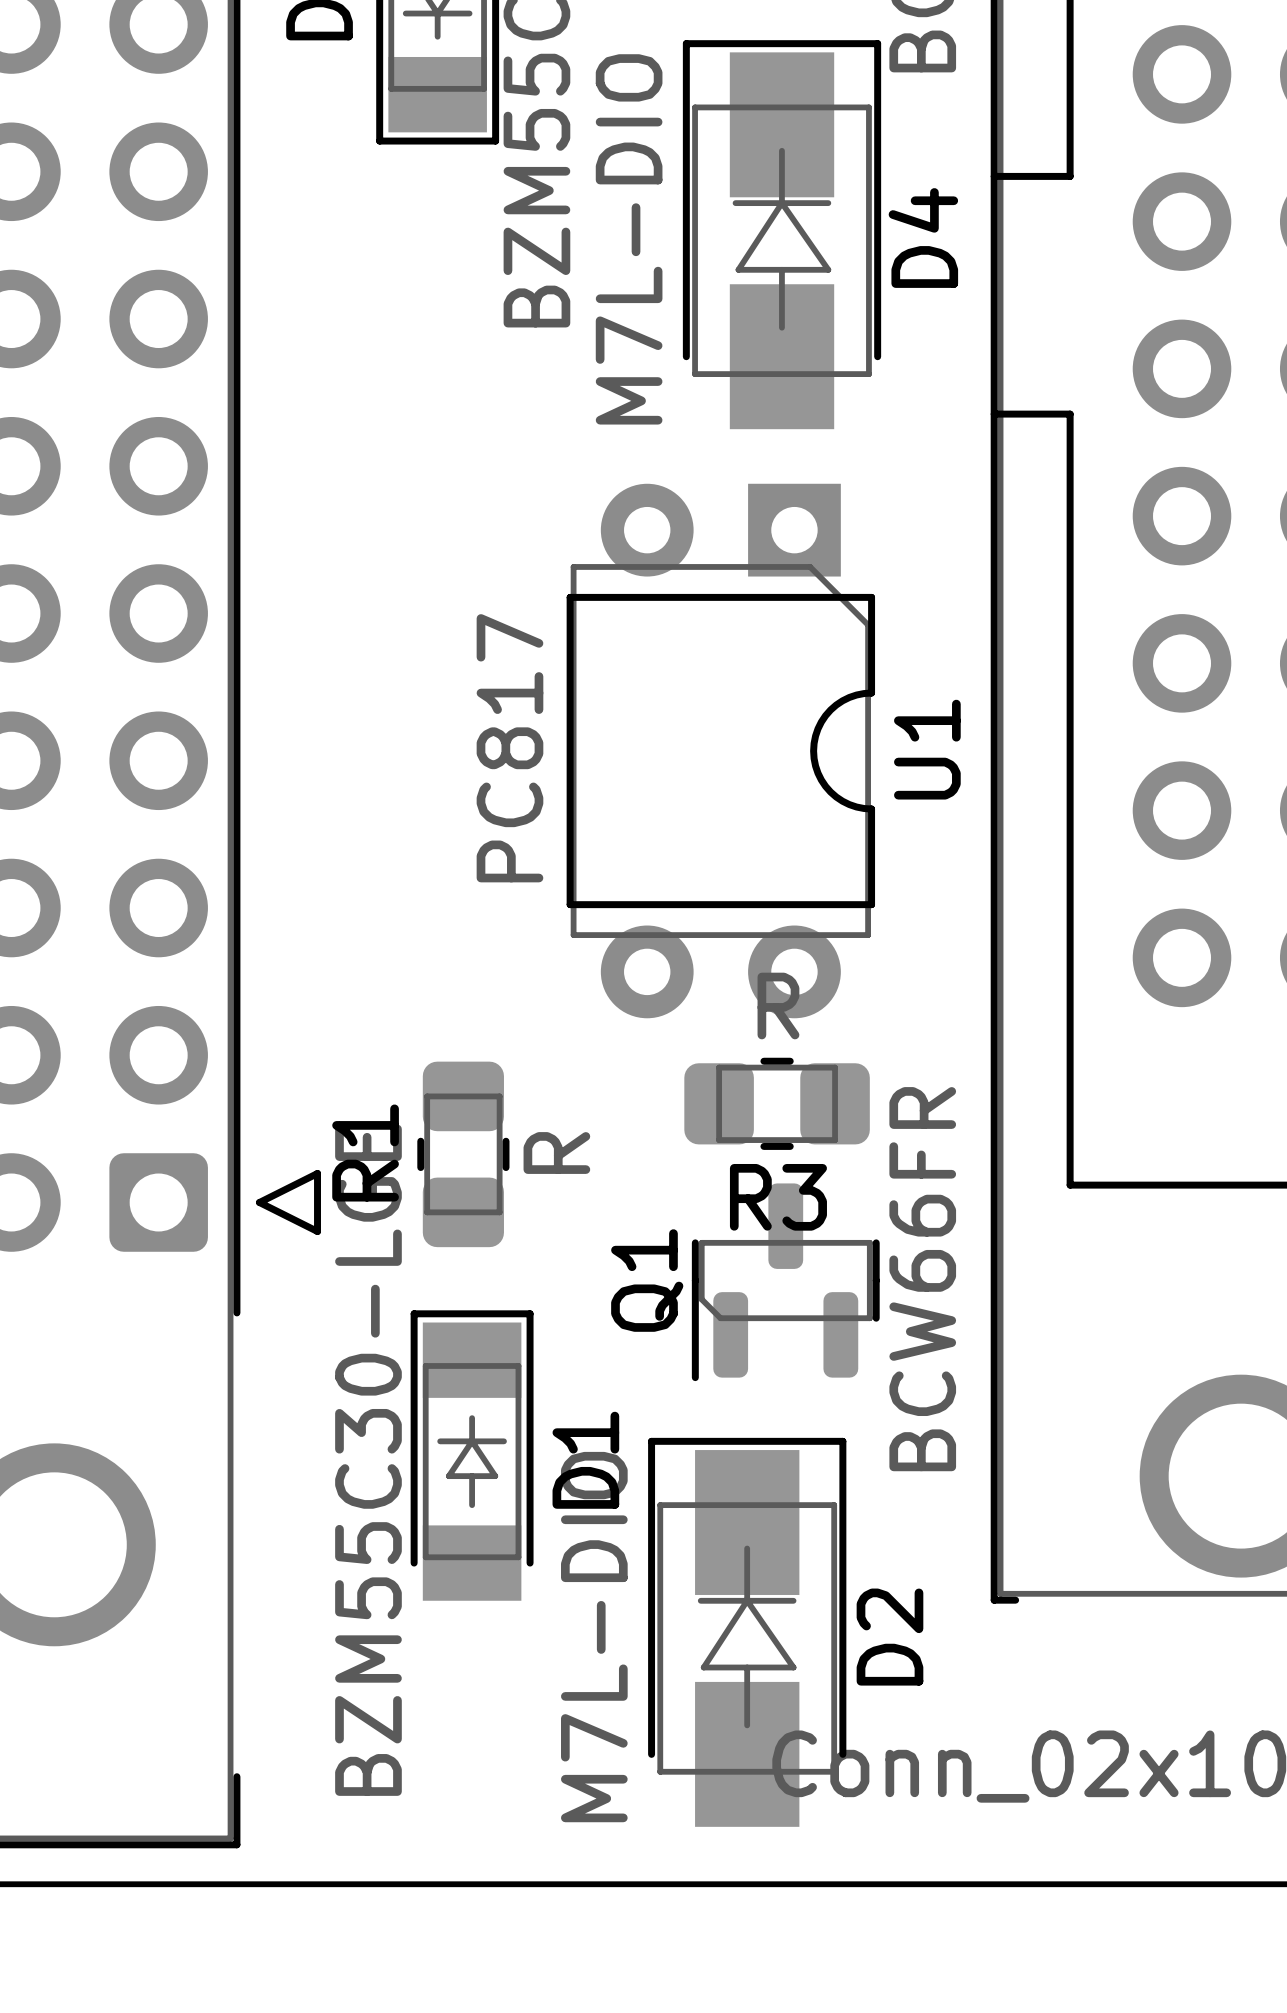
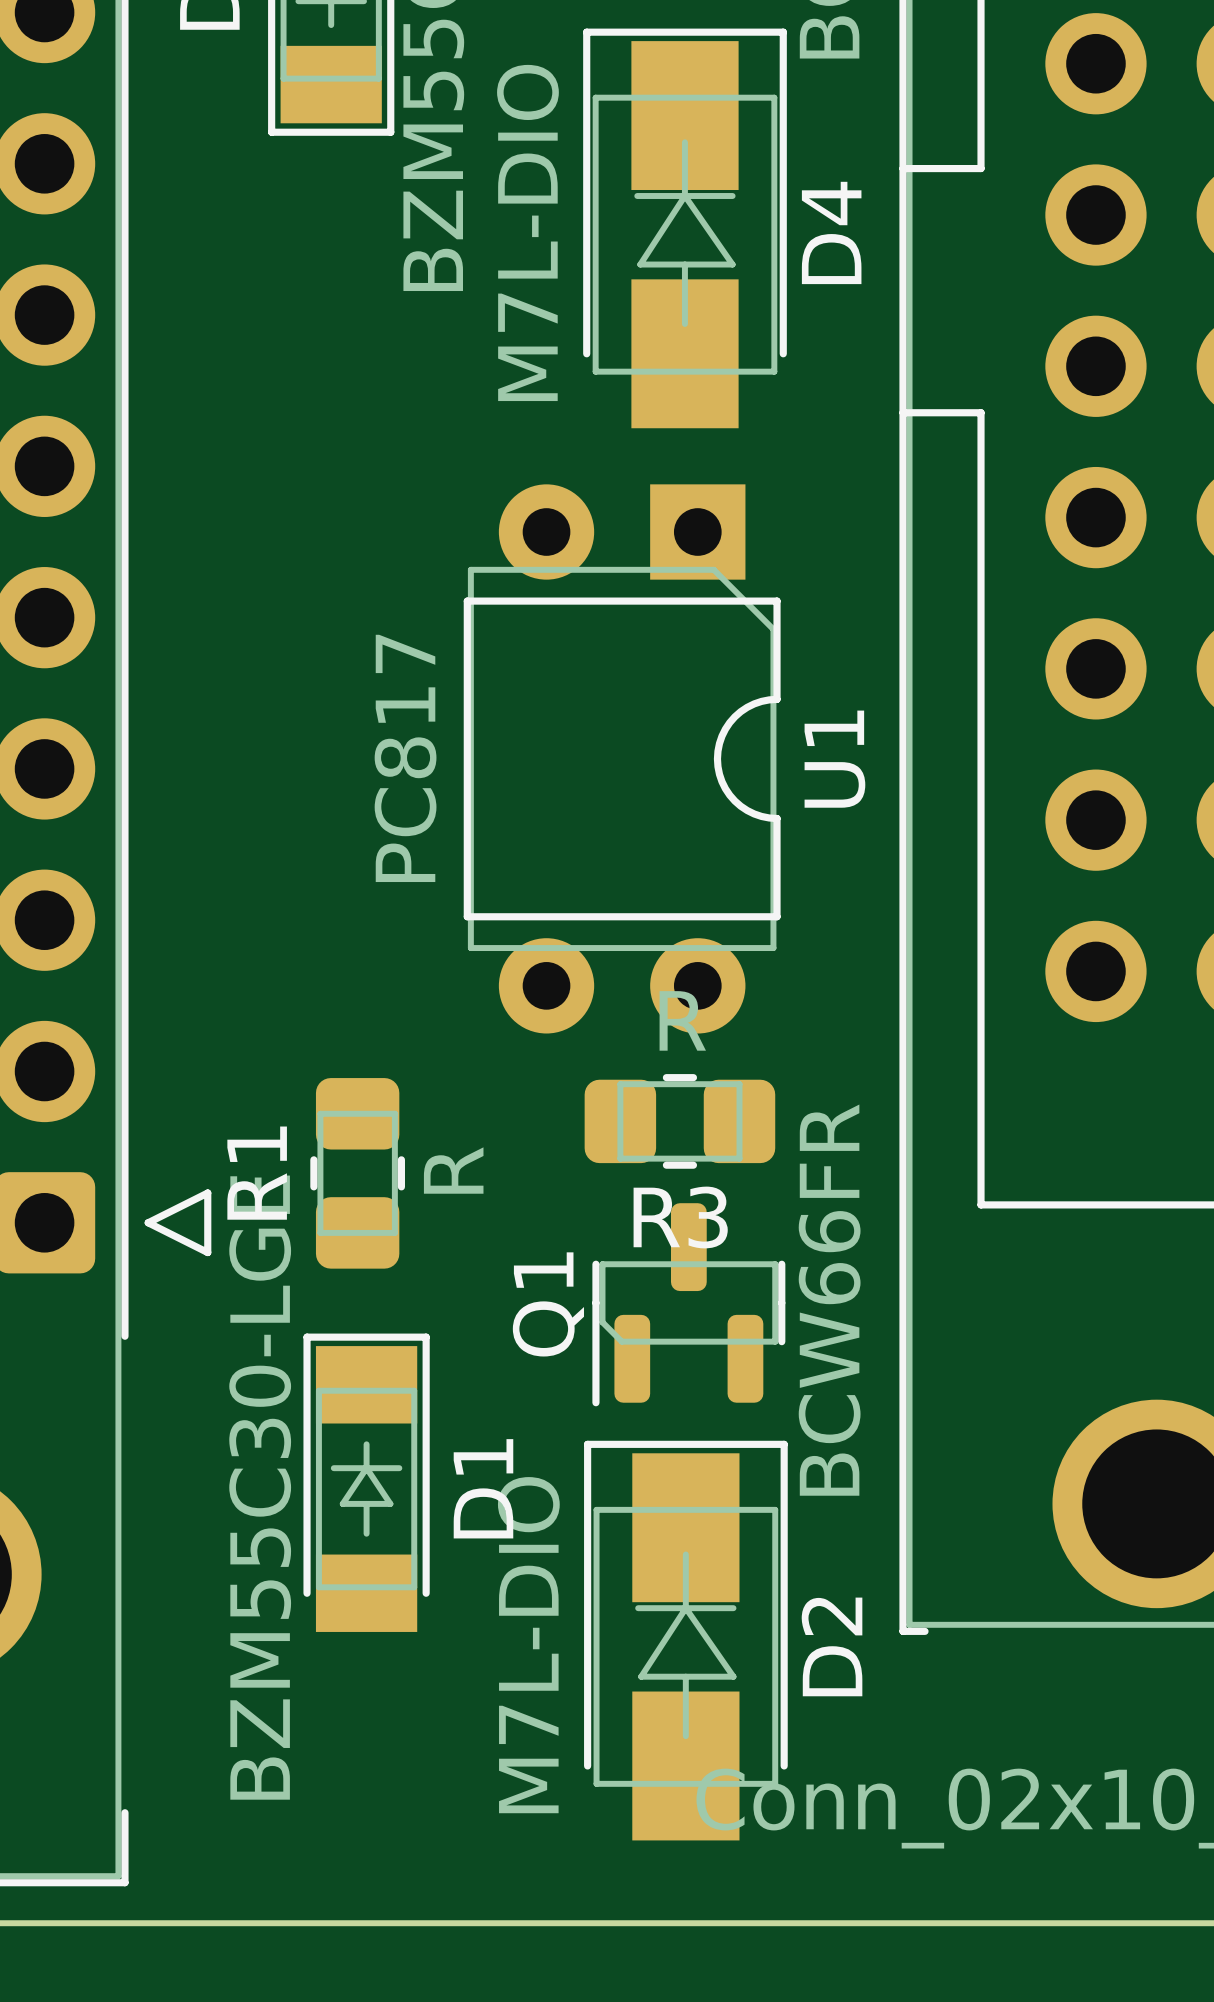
D2 position: (747, 1632) -> (685, 1640)

